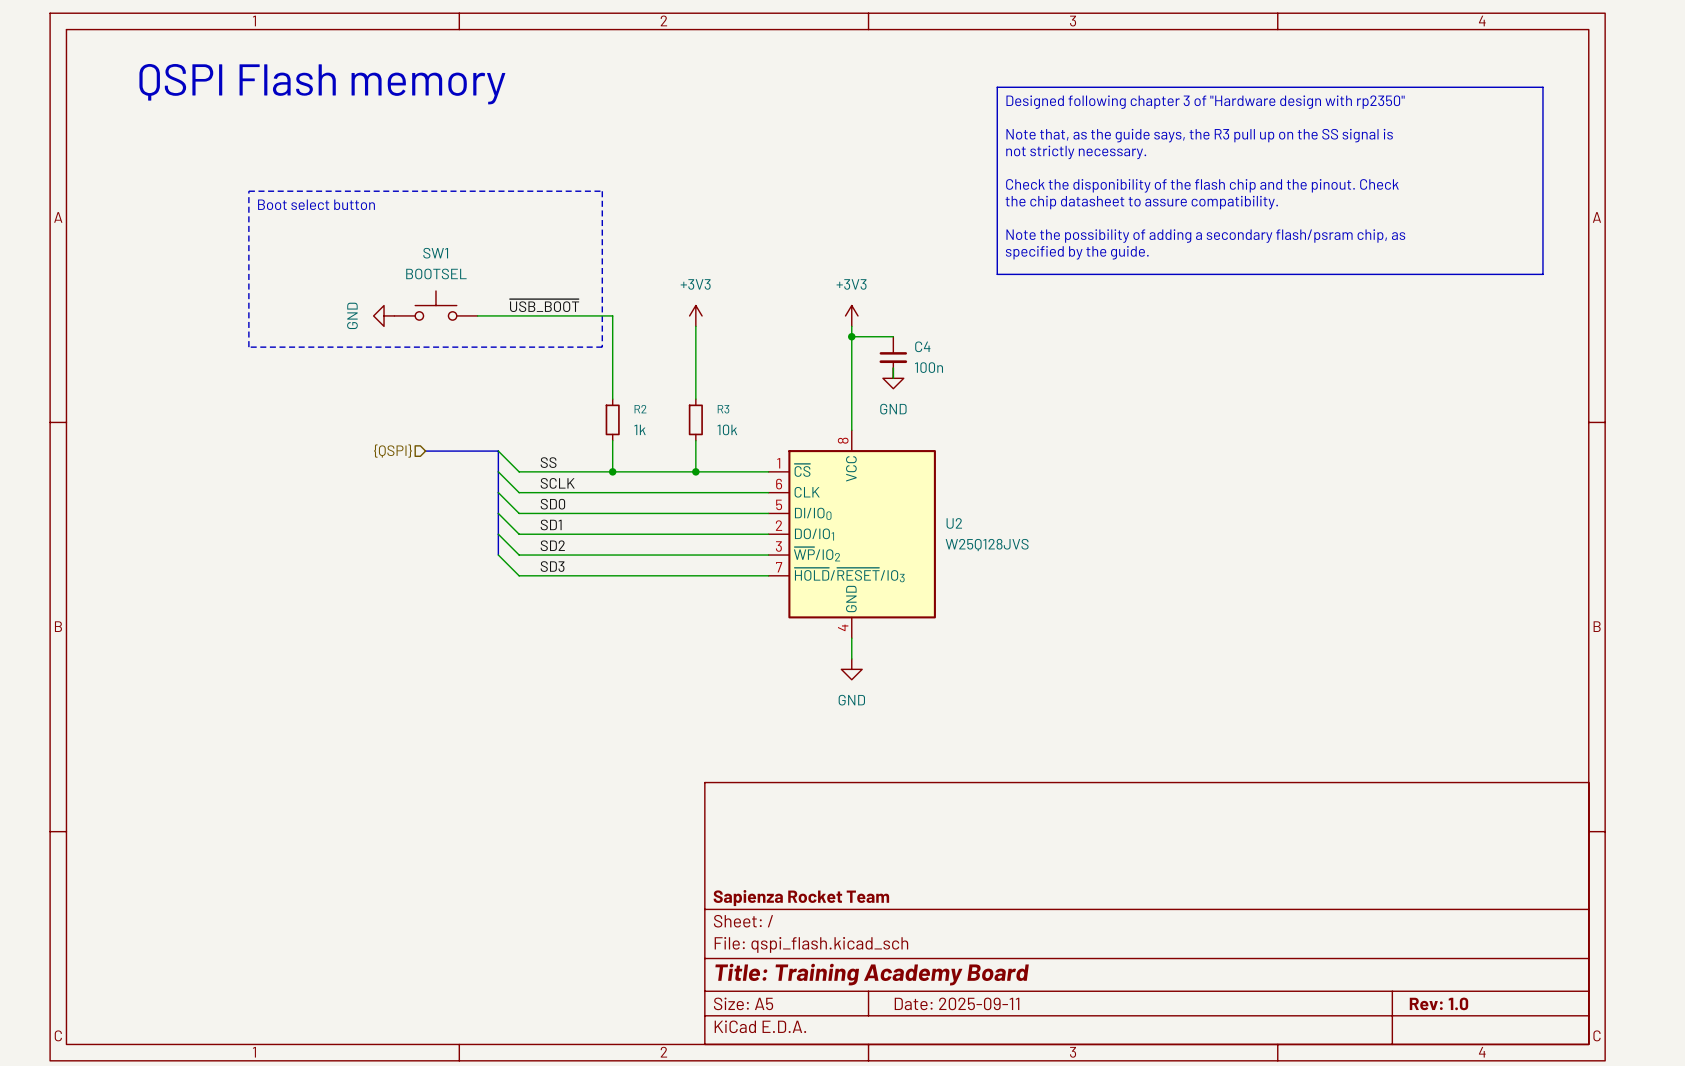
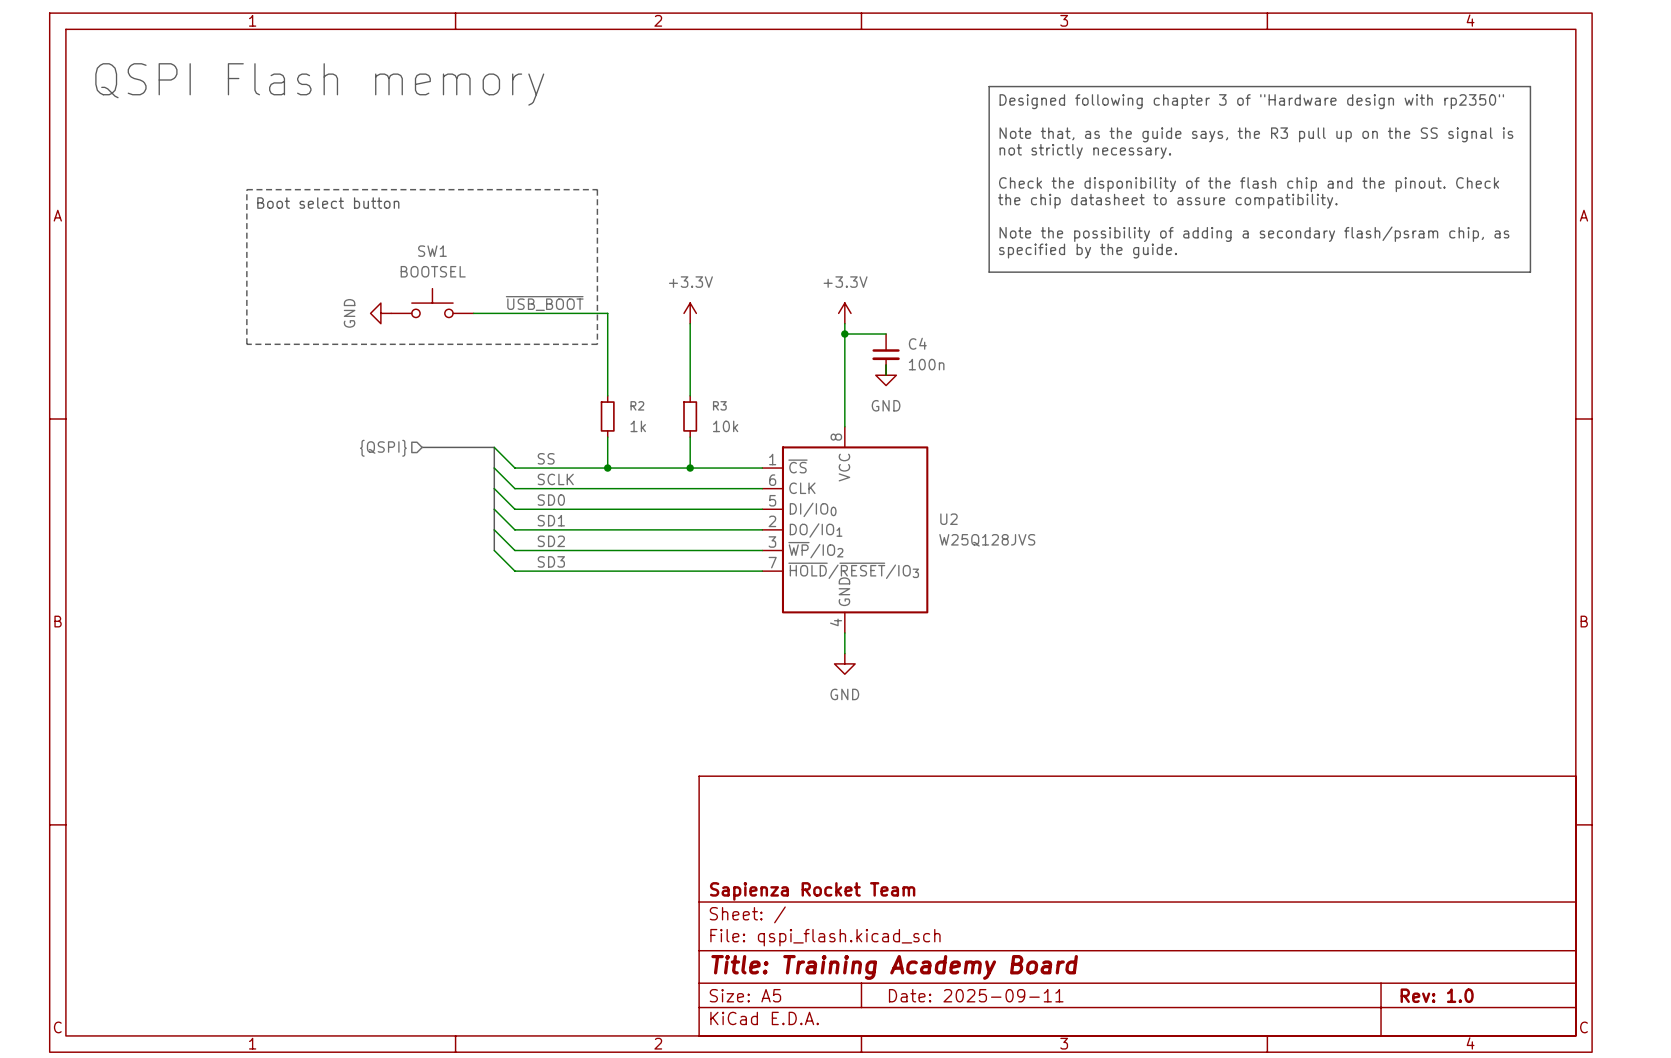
power symbol: +3V3 (695, 315) -> +3.3V (690, 313)
power symbol: +3V3 (851, 315) -> +3.3V (844, 313)

